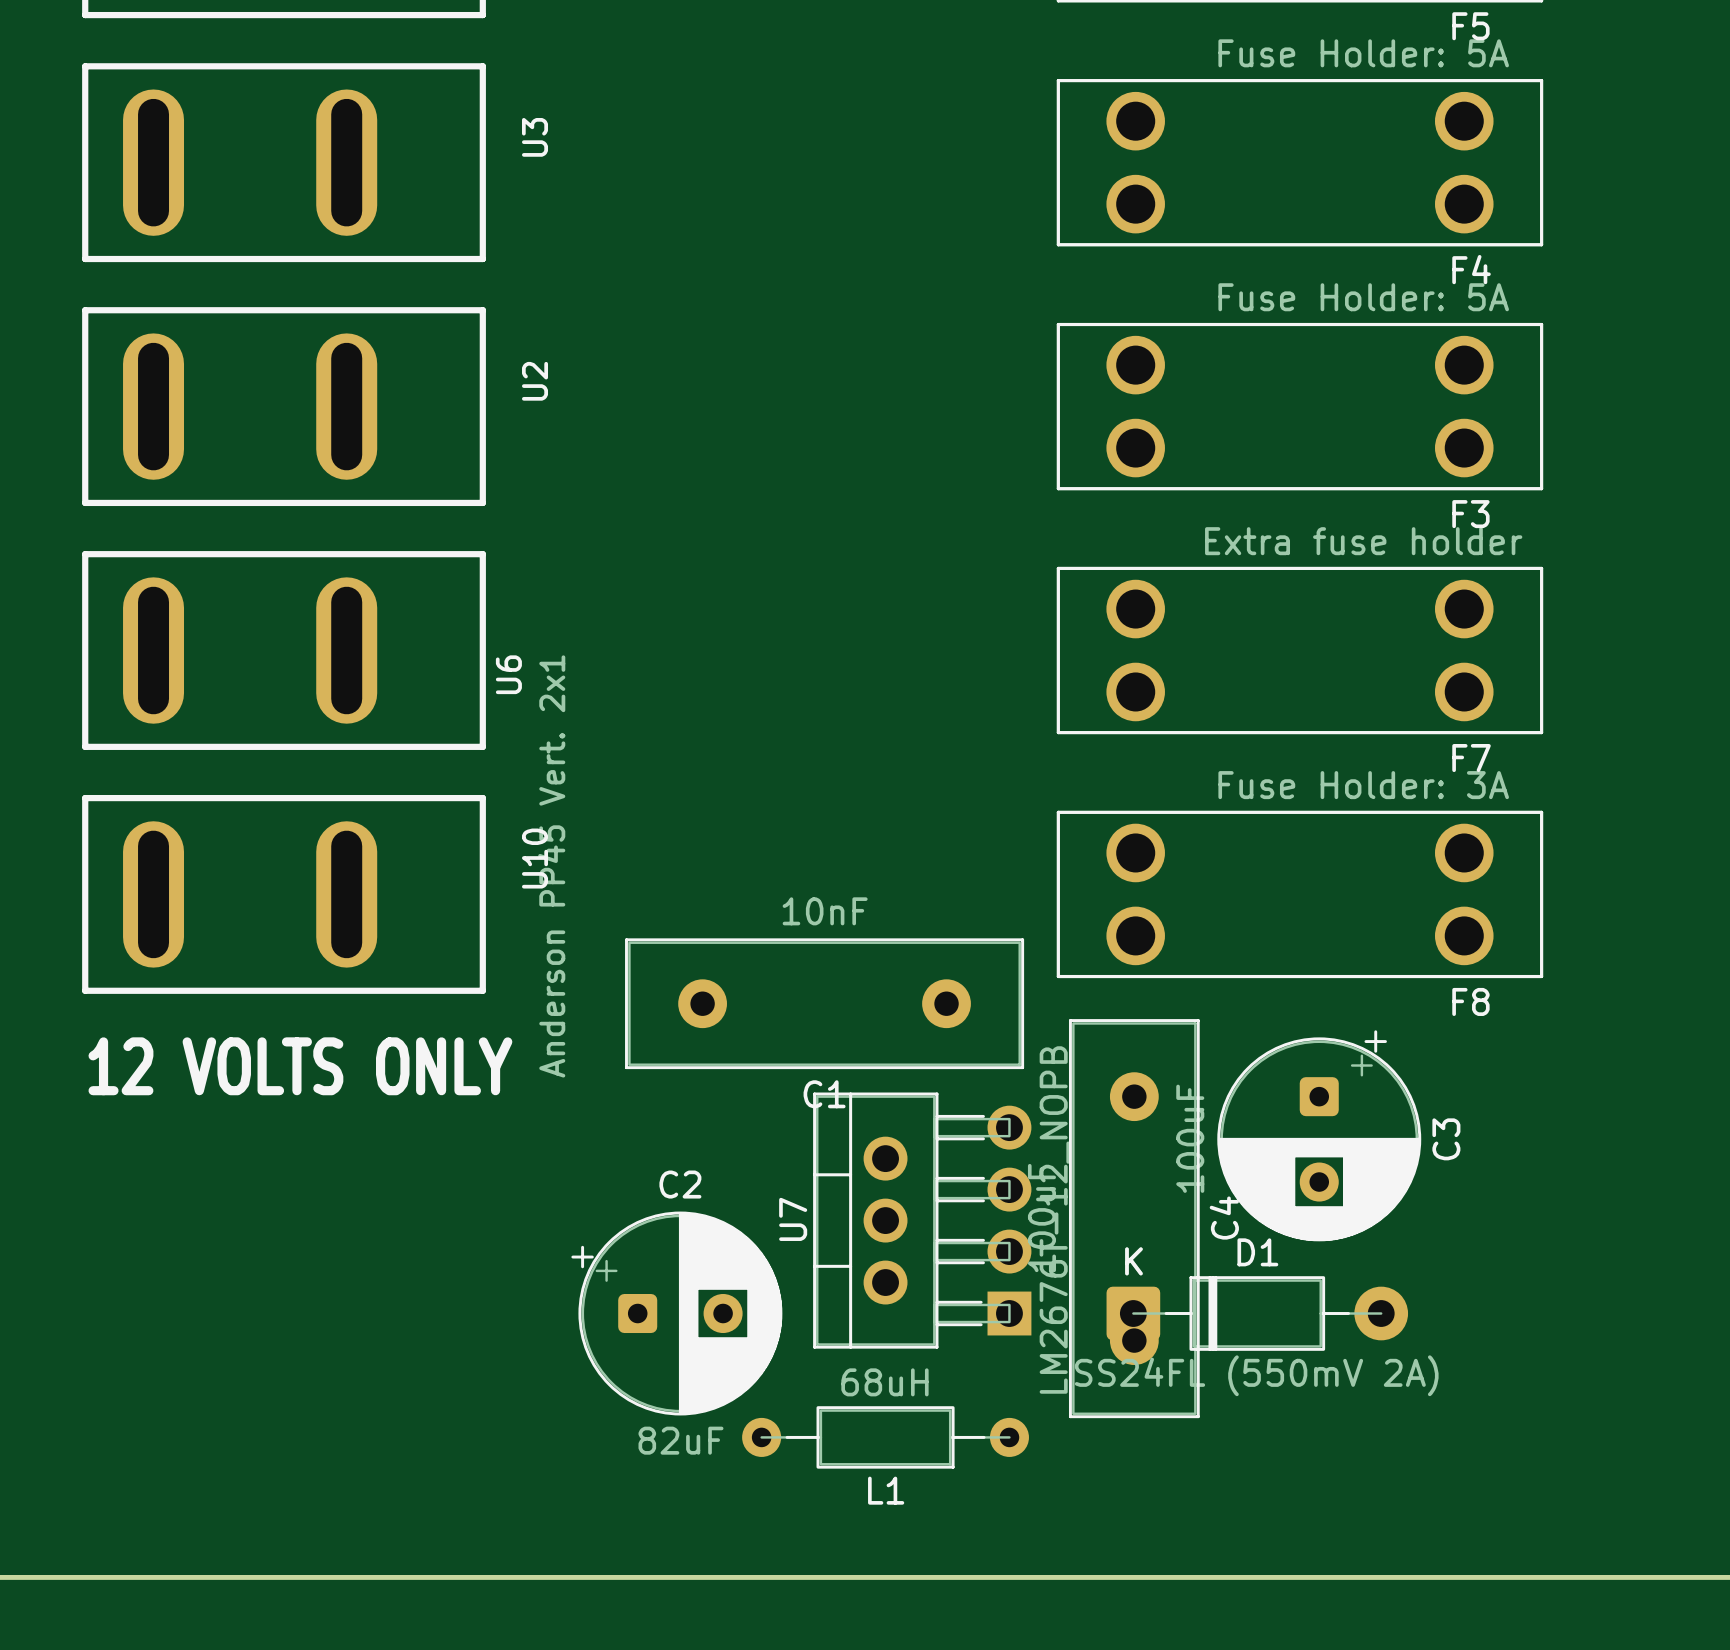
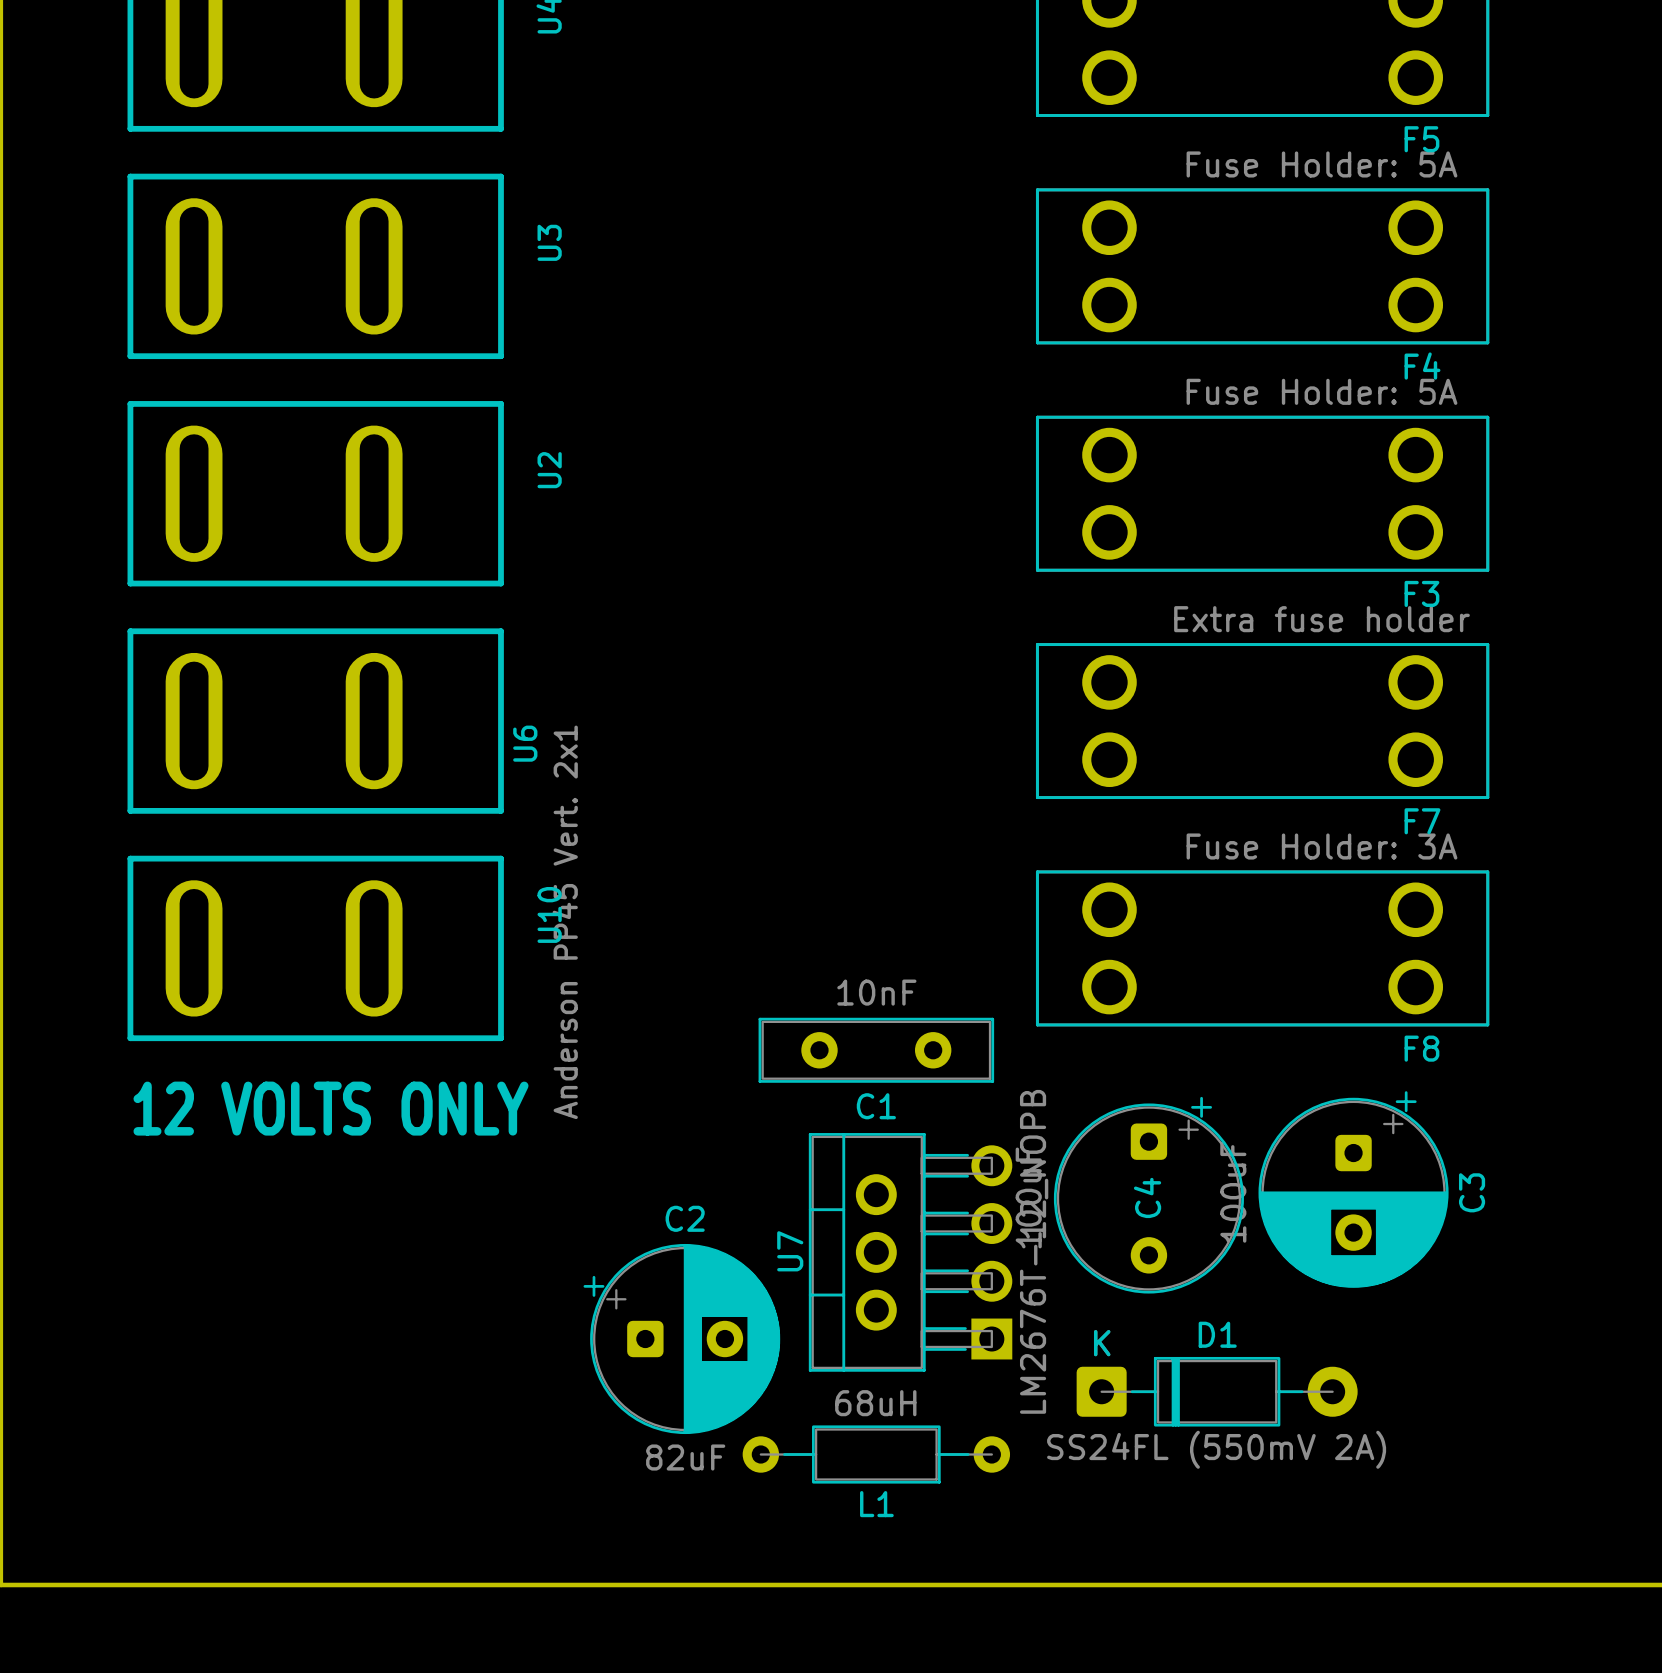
C1 footprint: [625, 938, 1025, 1070] -> [758, 1017, 995, 1083]
C4 footprint: [1068, 1019, 1200, 1419] -> [1053, 1096, 1244, 1294]
C3 position: (1319, 1135) -> (1353, 1189)
C4 name position: C4 (1224, 1218) -> C4 (1147, 1197)
D1 position: (1257, 1313) -> (1217, 1391)

